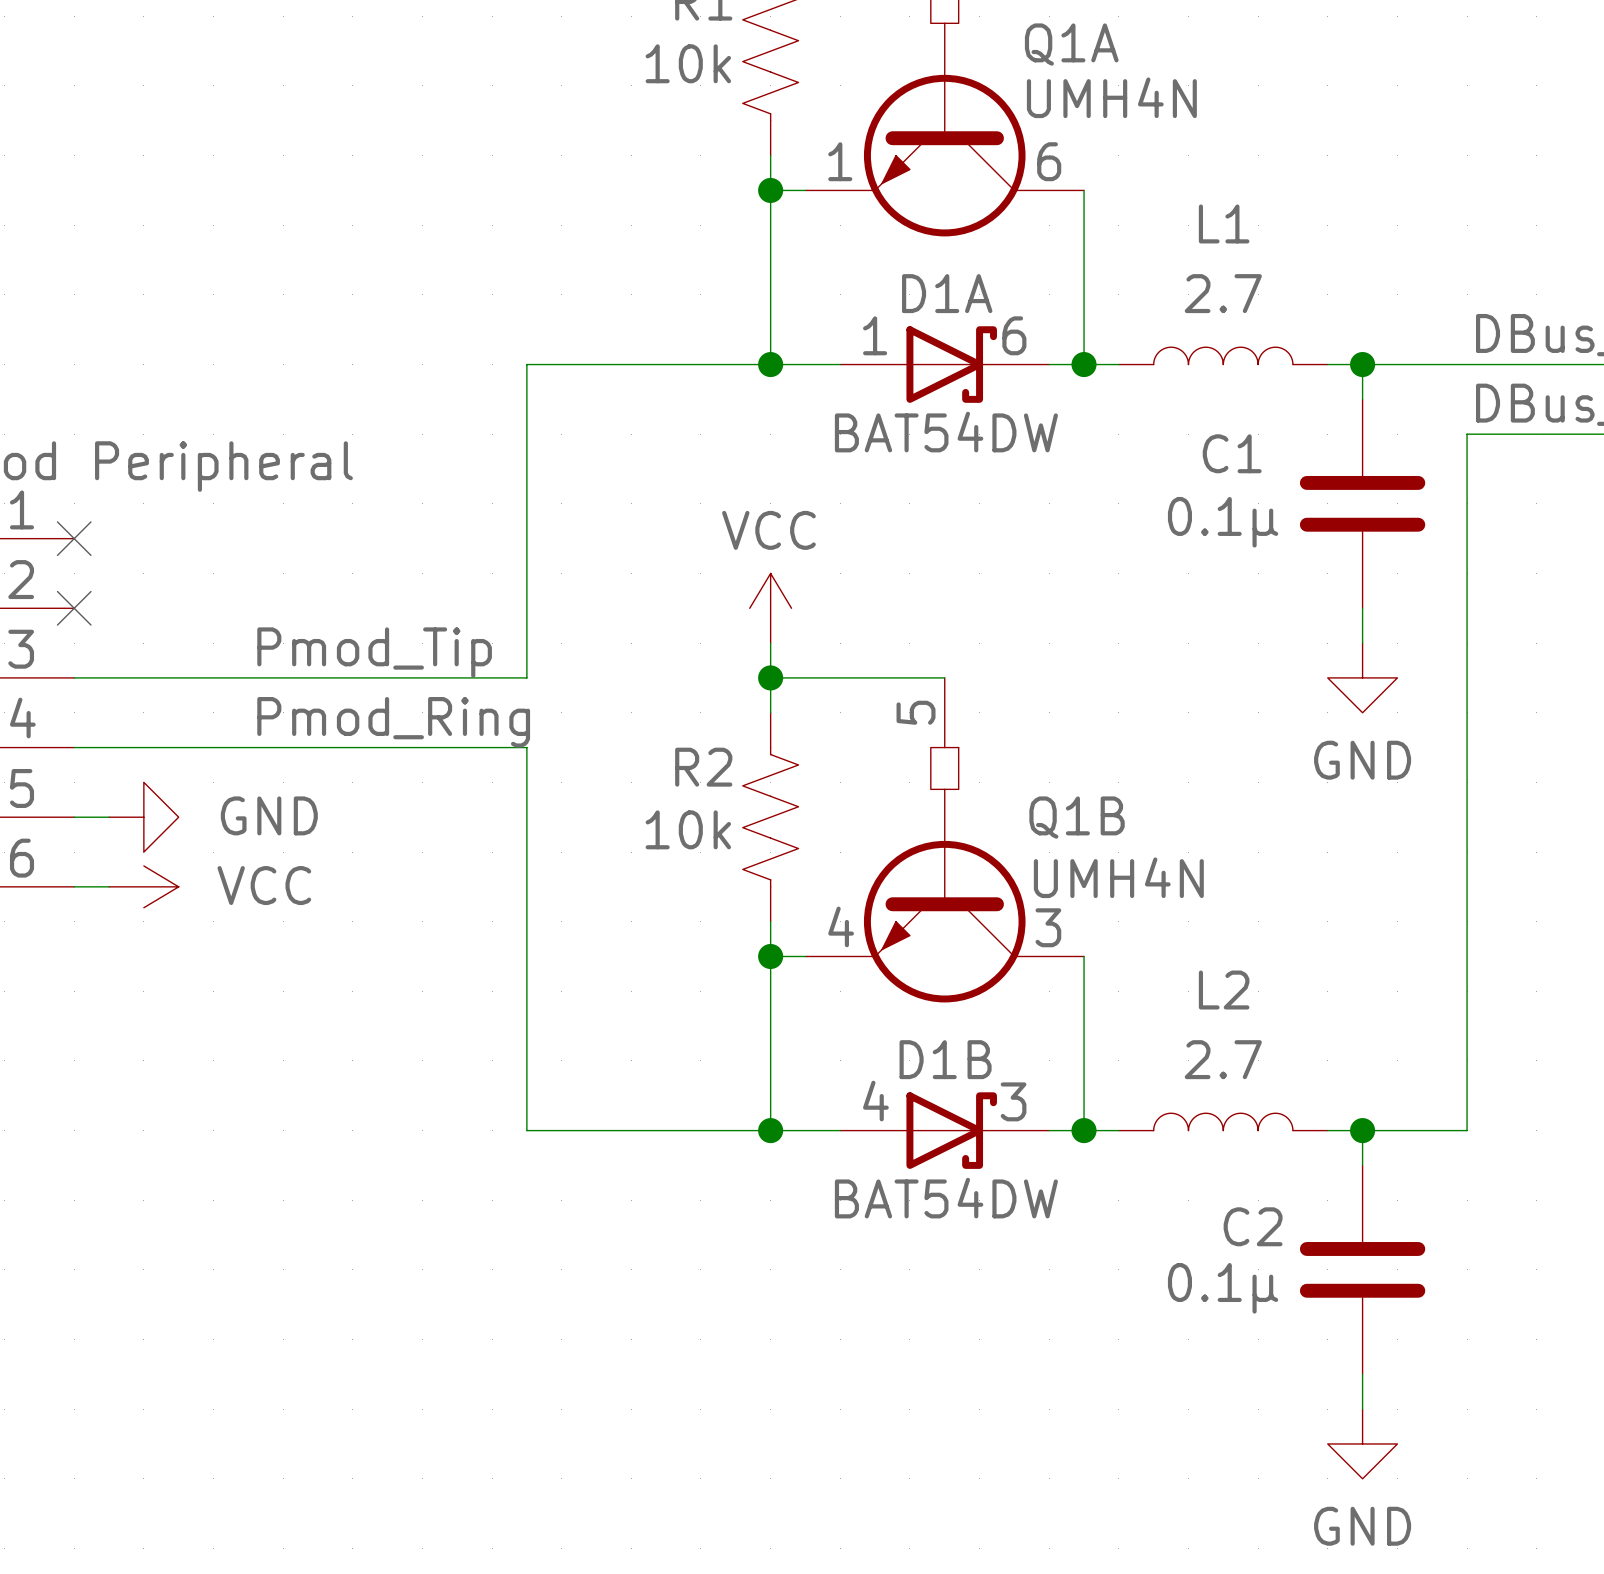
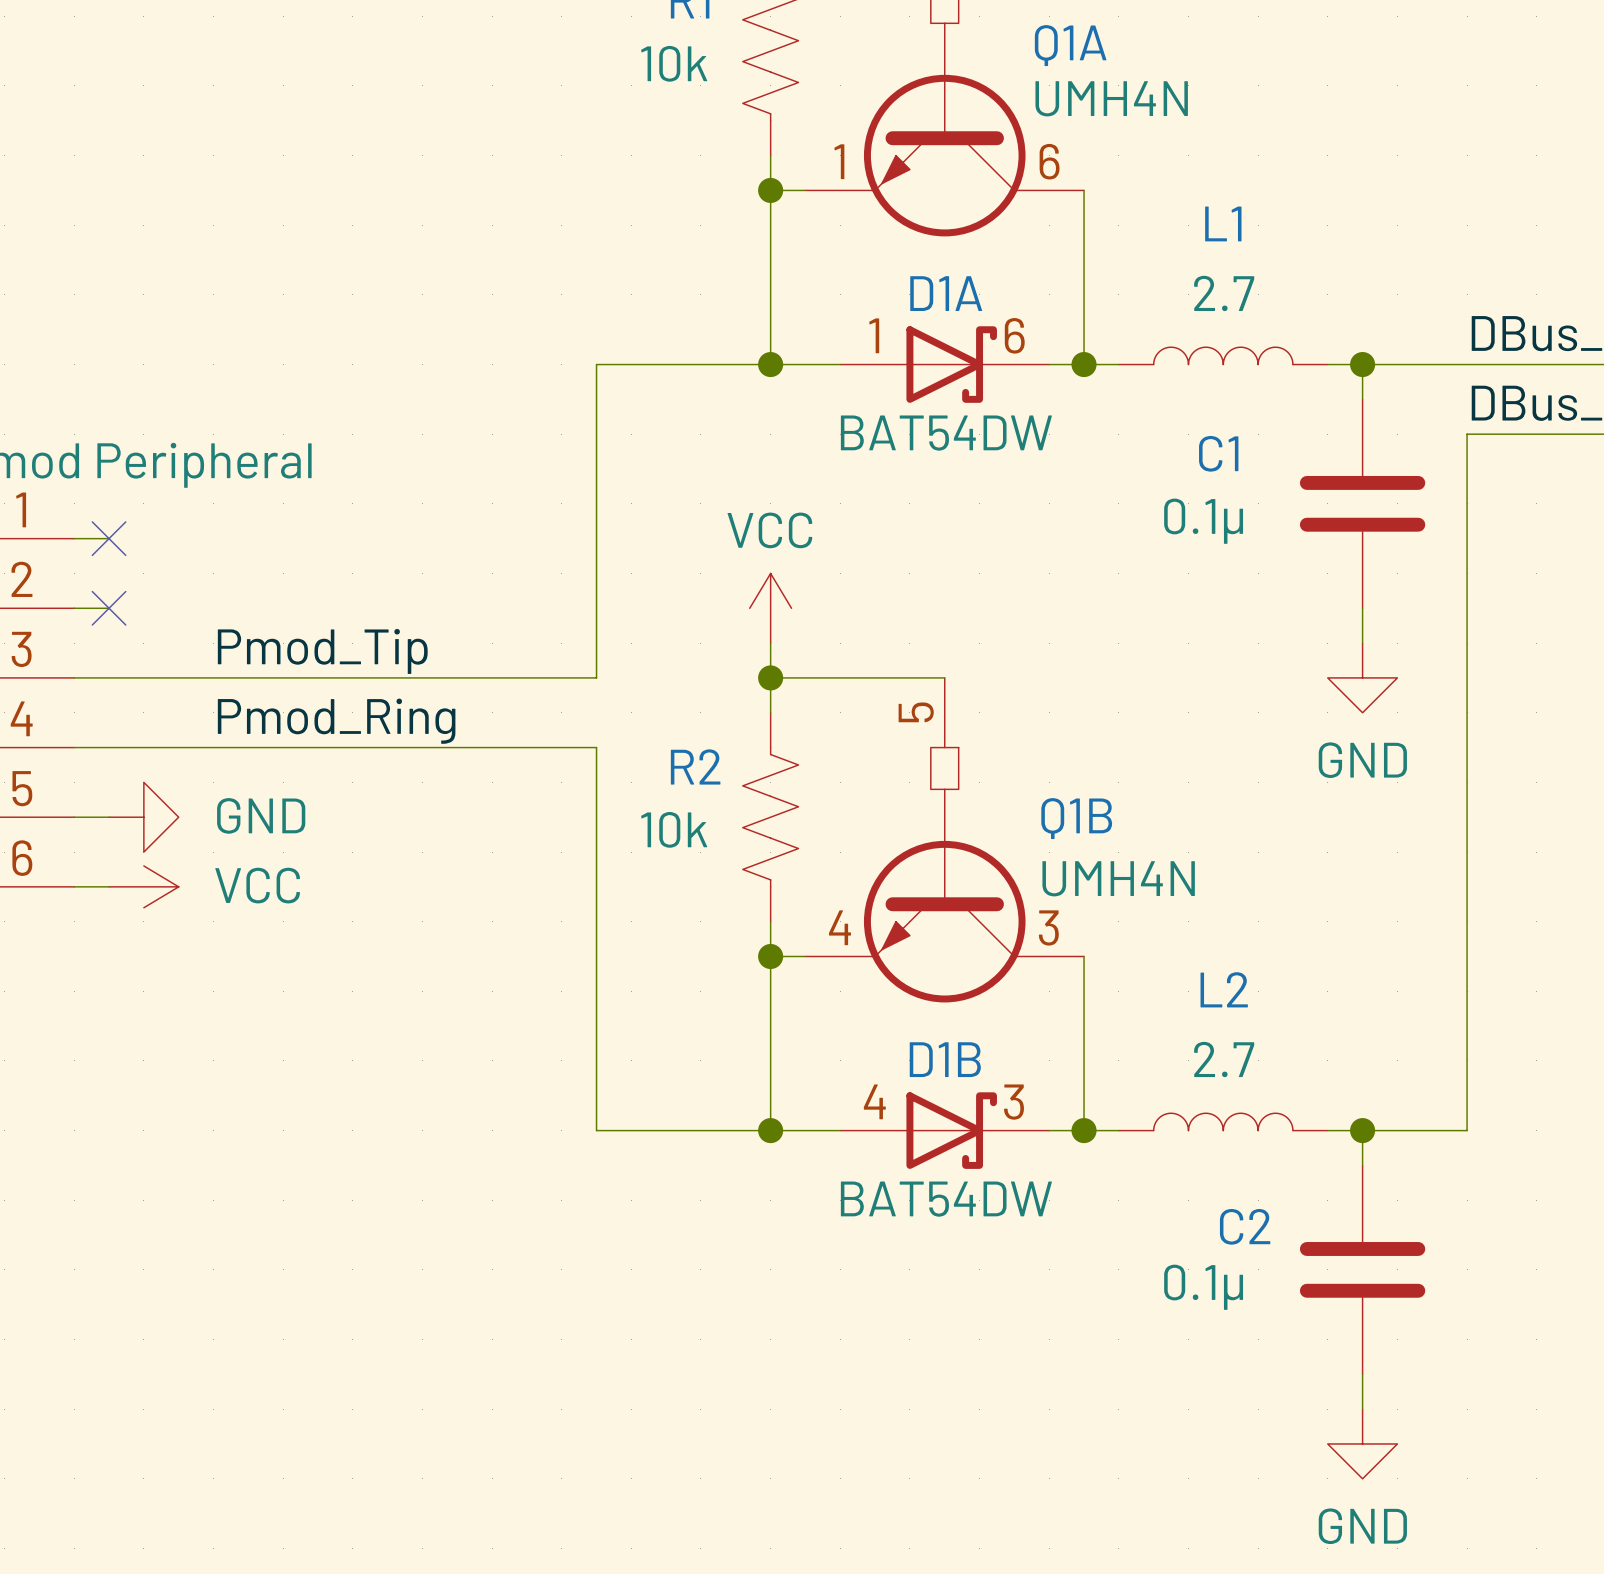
wire: (596, 364) (526, 364) (526, 677) -> (596, 364) (596, 677) (526, 677)
wire: none -> (74, 538) (109, 538)
no-connect mark position: (74, 538) -> (109, 538)
wire: none -> (74, 608) (109, 608)
no-connect mark position: (74, 608) -> (109, 608)
label position: Pmod_Tip (374, 652) -> Pmod_Tip (322, 651)
label position: Pmod_Ring (393, 722) -> Pmod_Ring (336, 721)
wire: (526, 747) (526, 1130) (596, 1130) -> (526, 747) (596, 747) (596, 1130)

